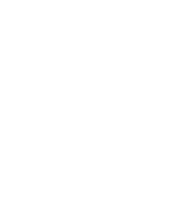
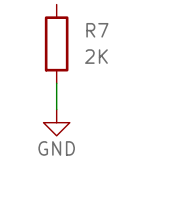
R7: none -> 2K (56, 43)
wire: none -> (56, 83) (56, 109)
power symbol: none -> GND (56, 122)

